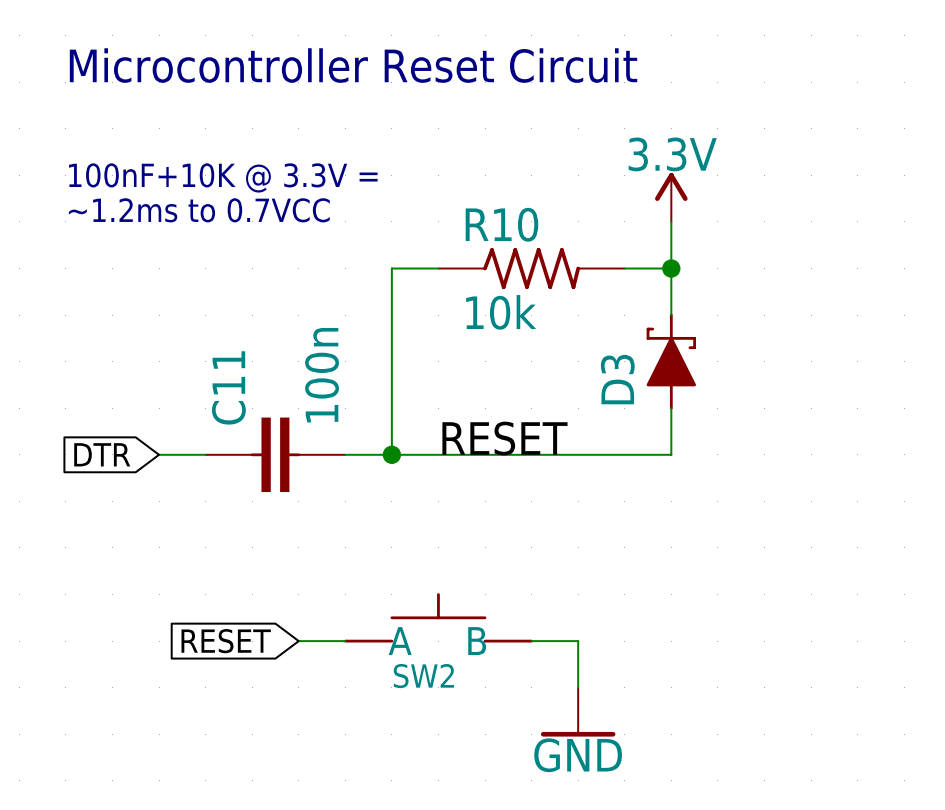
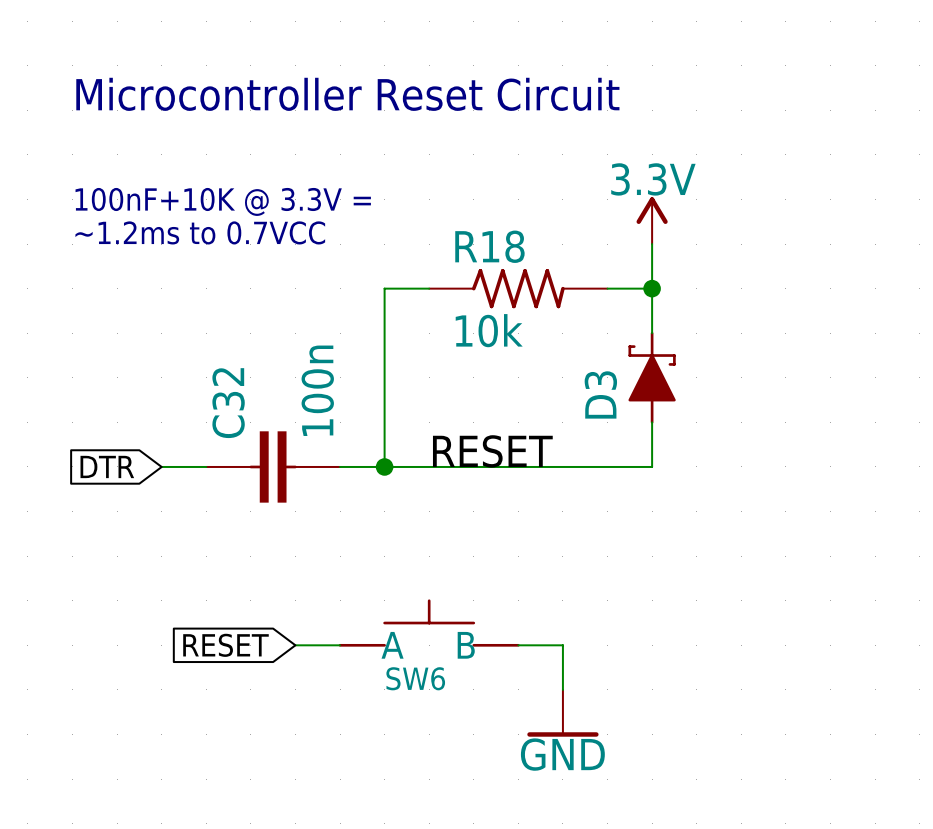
R10 name: R10 (501, 224) -> R18 (489, 246)
C11 name: C11 (228, 387) -> C32 (228, 403)
SW2 name: SW2 (423, 676) -> SW6 (415, 678)

